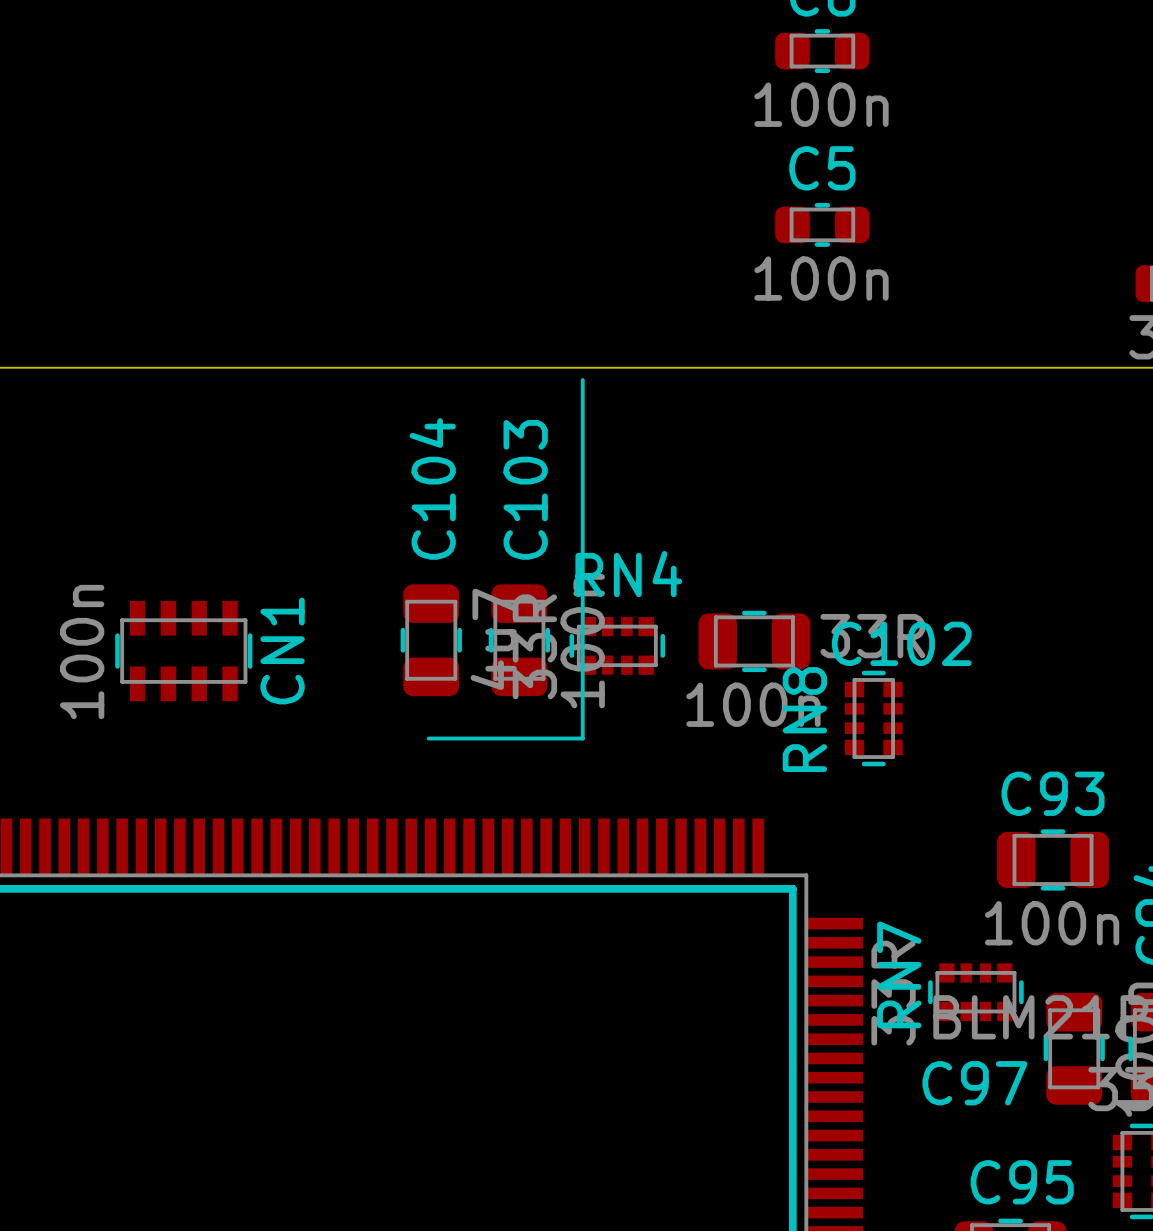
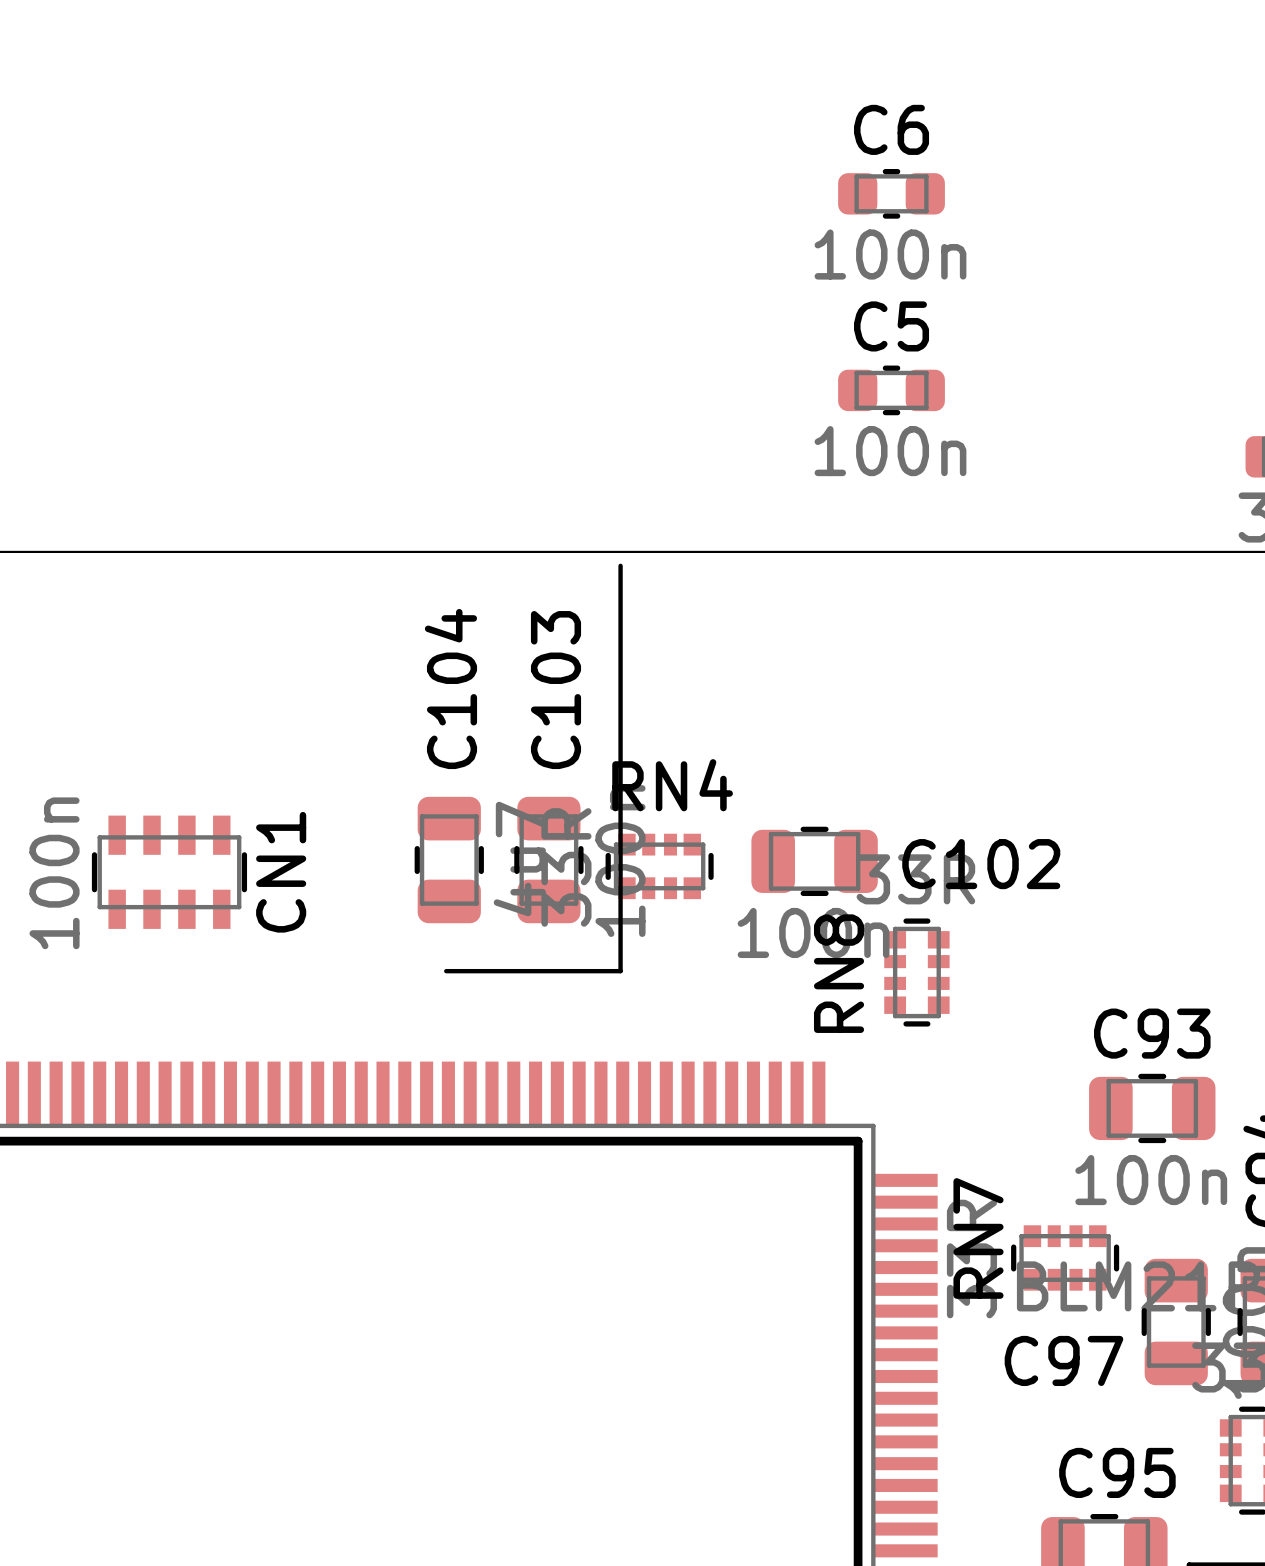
RN8 position: (873, 718) -> (916, 972)

